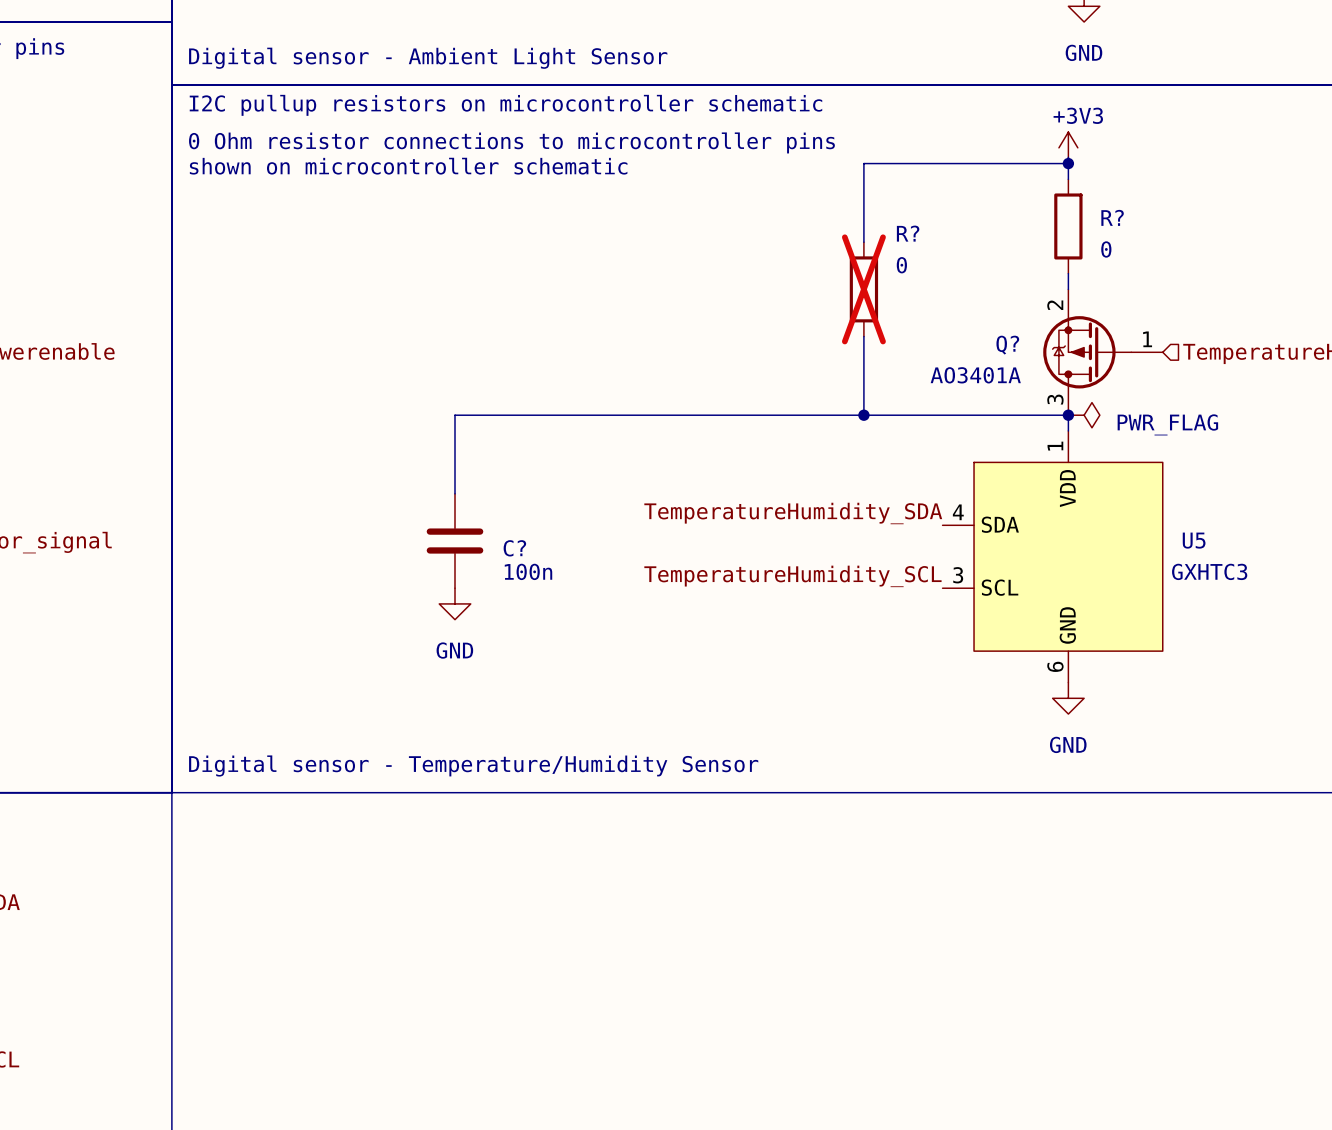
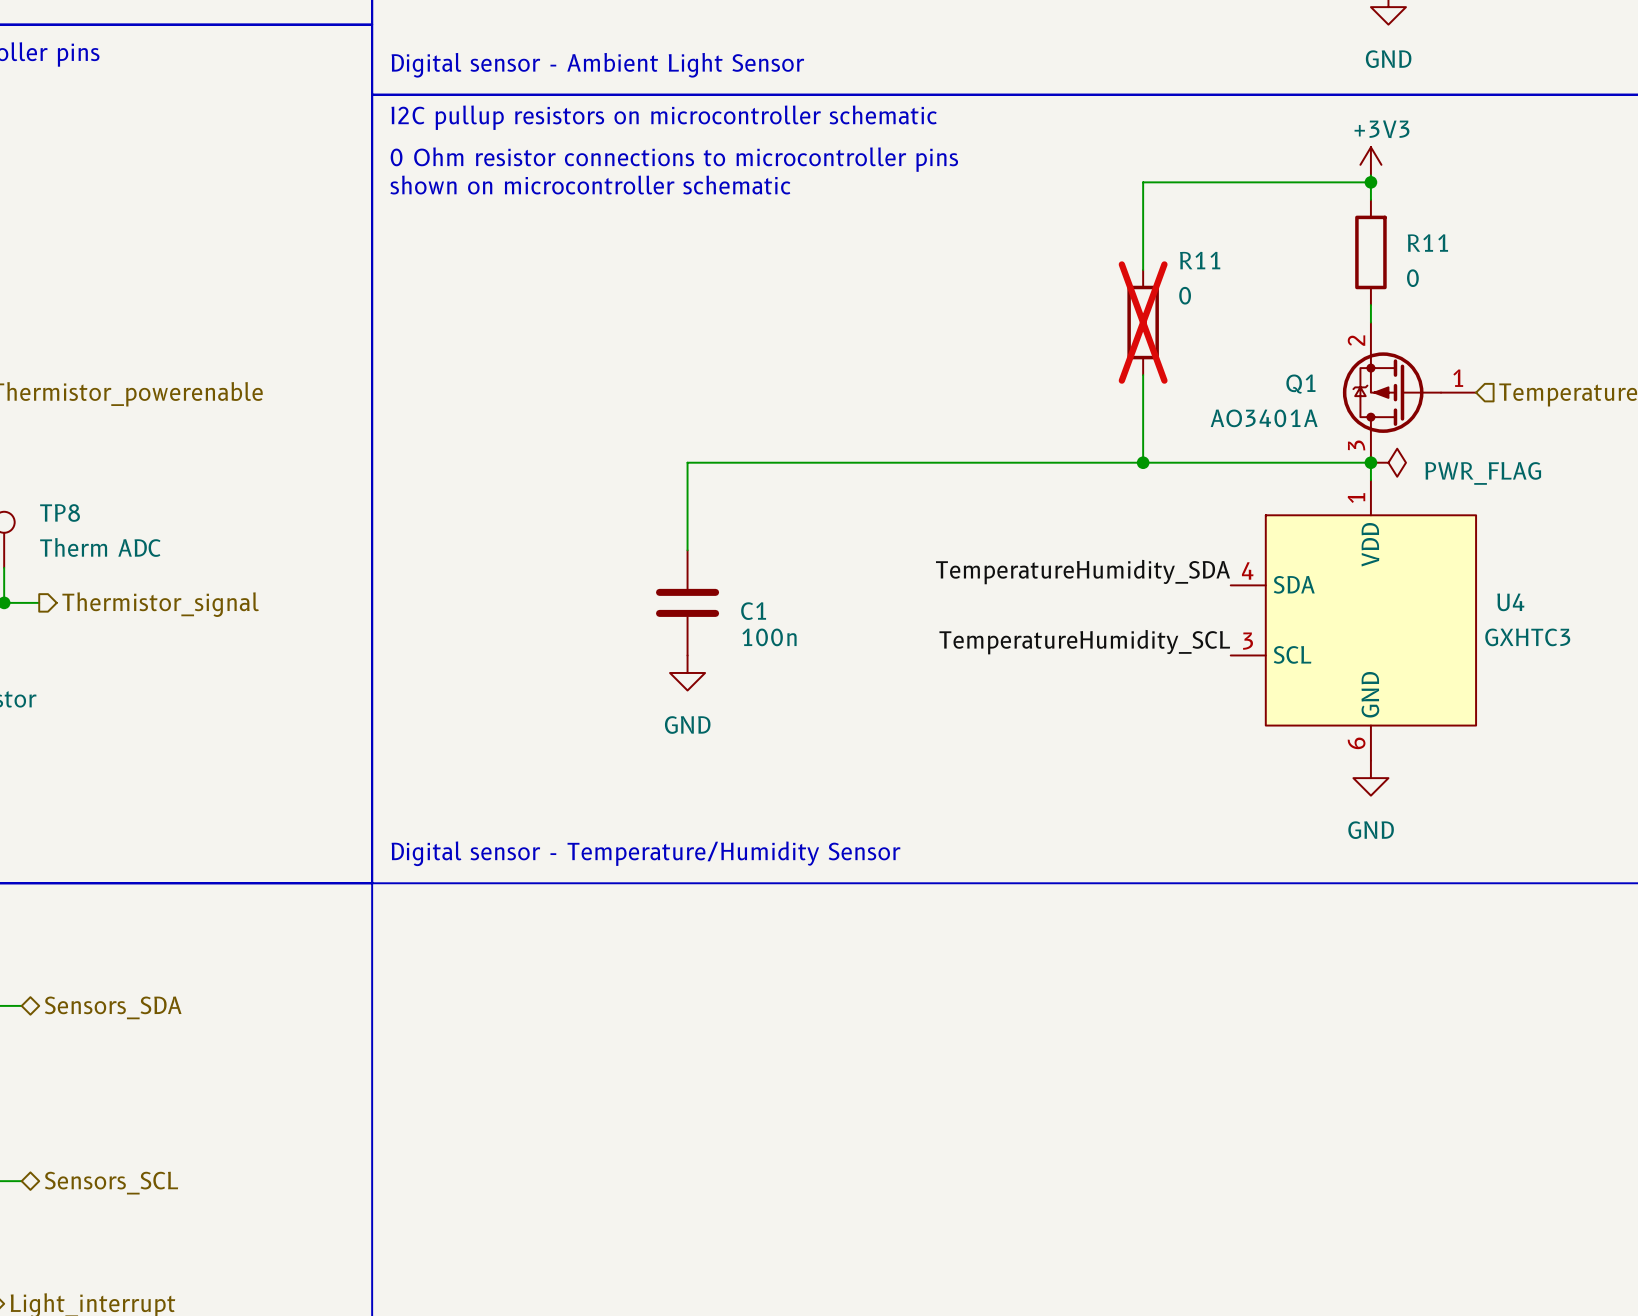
R? name: R? (1112, 217) -> R11 (1427, 243)
R? name: R? (908, 233) -> R11 (1200, 260)
Q? name: Q? (1007, 345) -> Q1 (1300, 384)
U5 name: U5 (1194, 540) -> U4 (1510, 602)
C? name: C? (514, 548) -> C1 (753, 611)

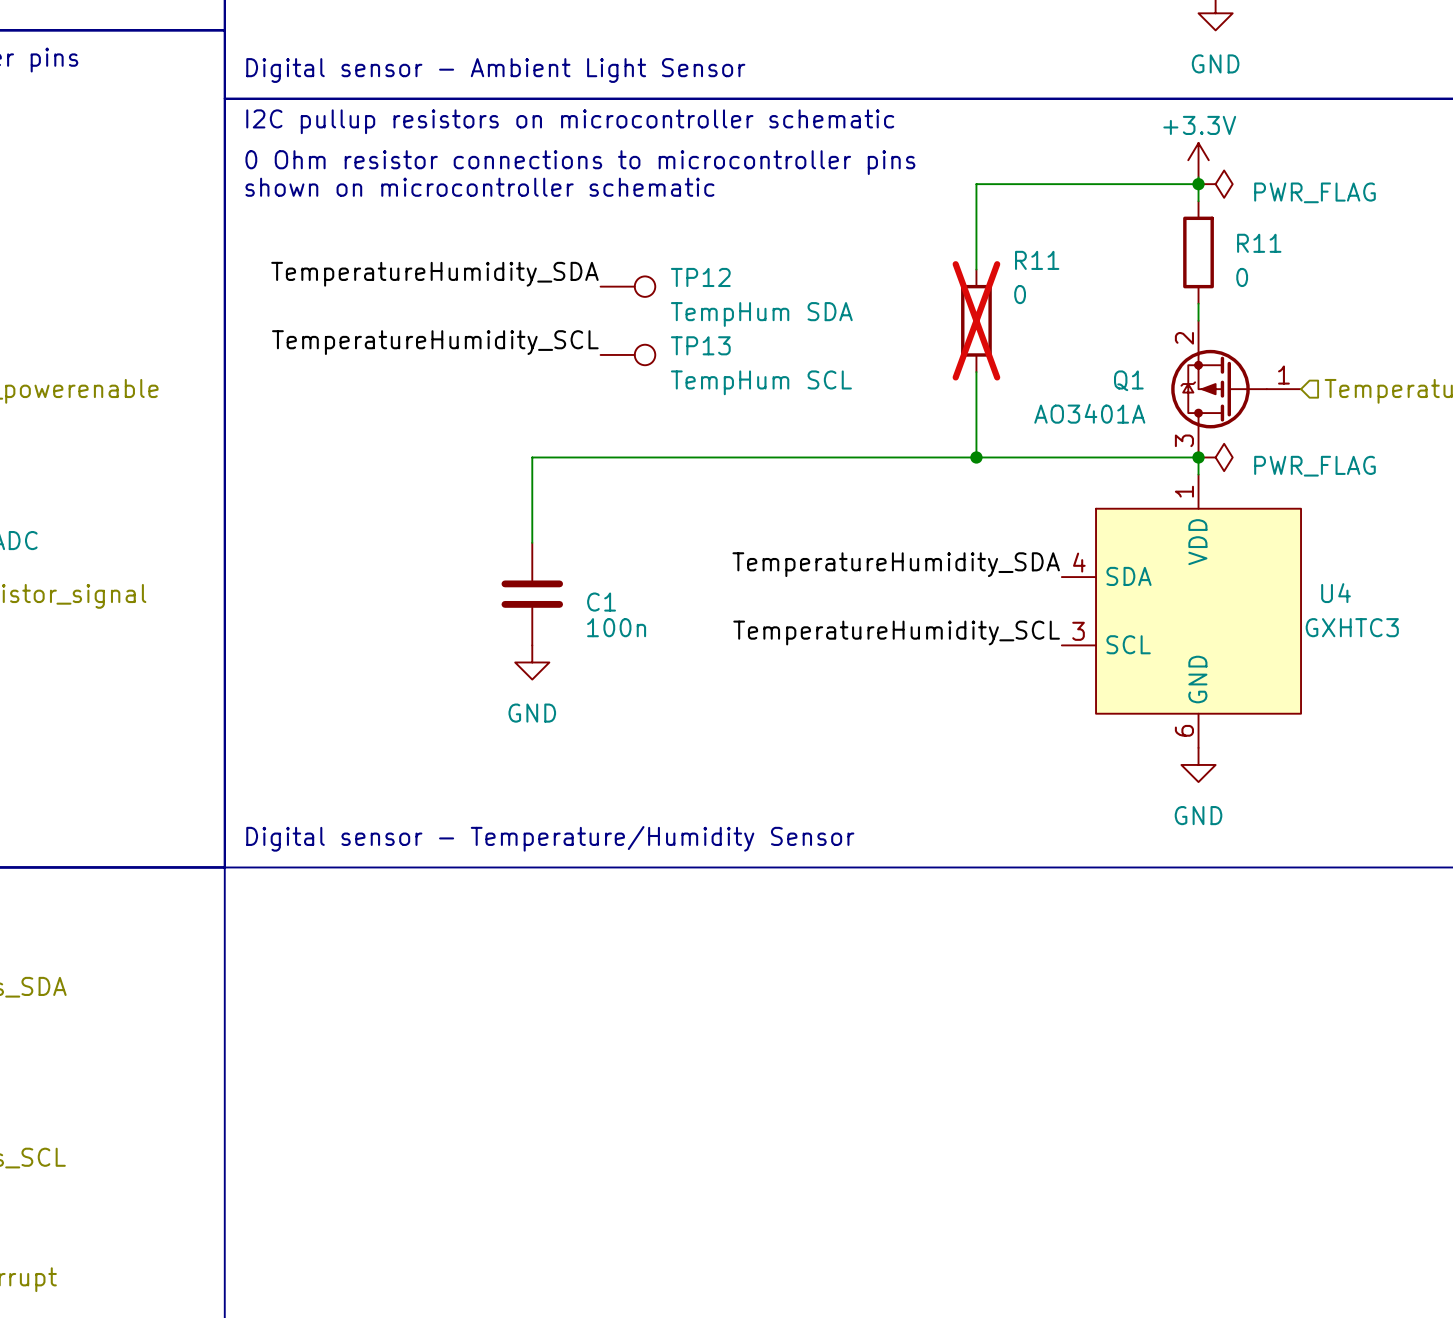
power symbol: +3V3 (1370, 164) -> +3.3V (1198, 160)
power symbol: none -> PWR_FLAG (1215, 184)
label: none -> TemperatureHumidity_SDA (434, 274)
TP12: none -> TempHum SDA (627, 286)
label: none -> TemperatureHumidity_SCL (435, 342)
TP13: none -> TempHum SCL (627, 354)

